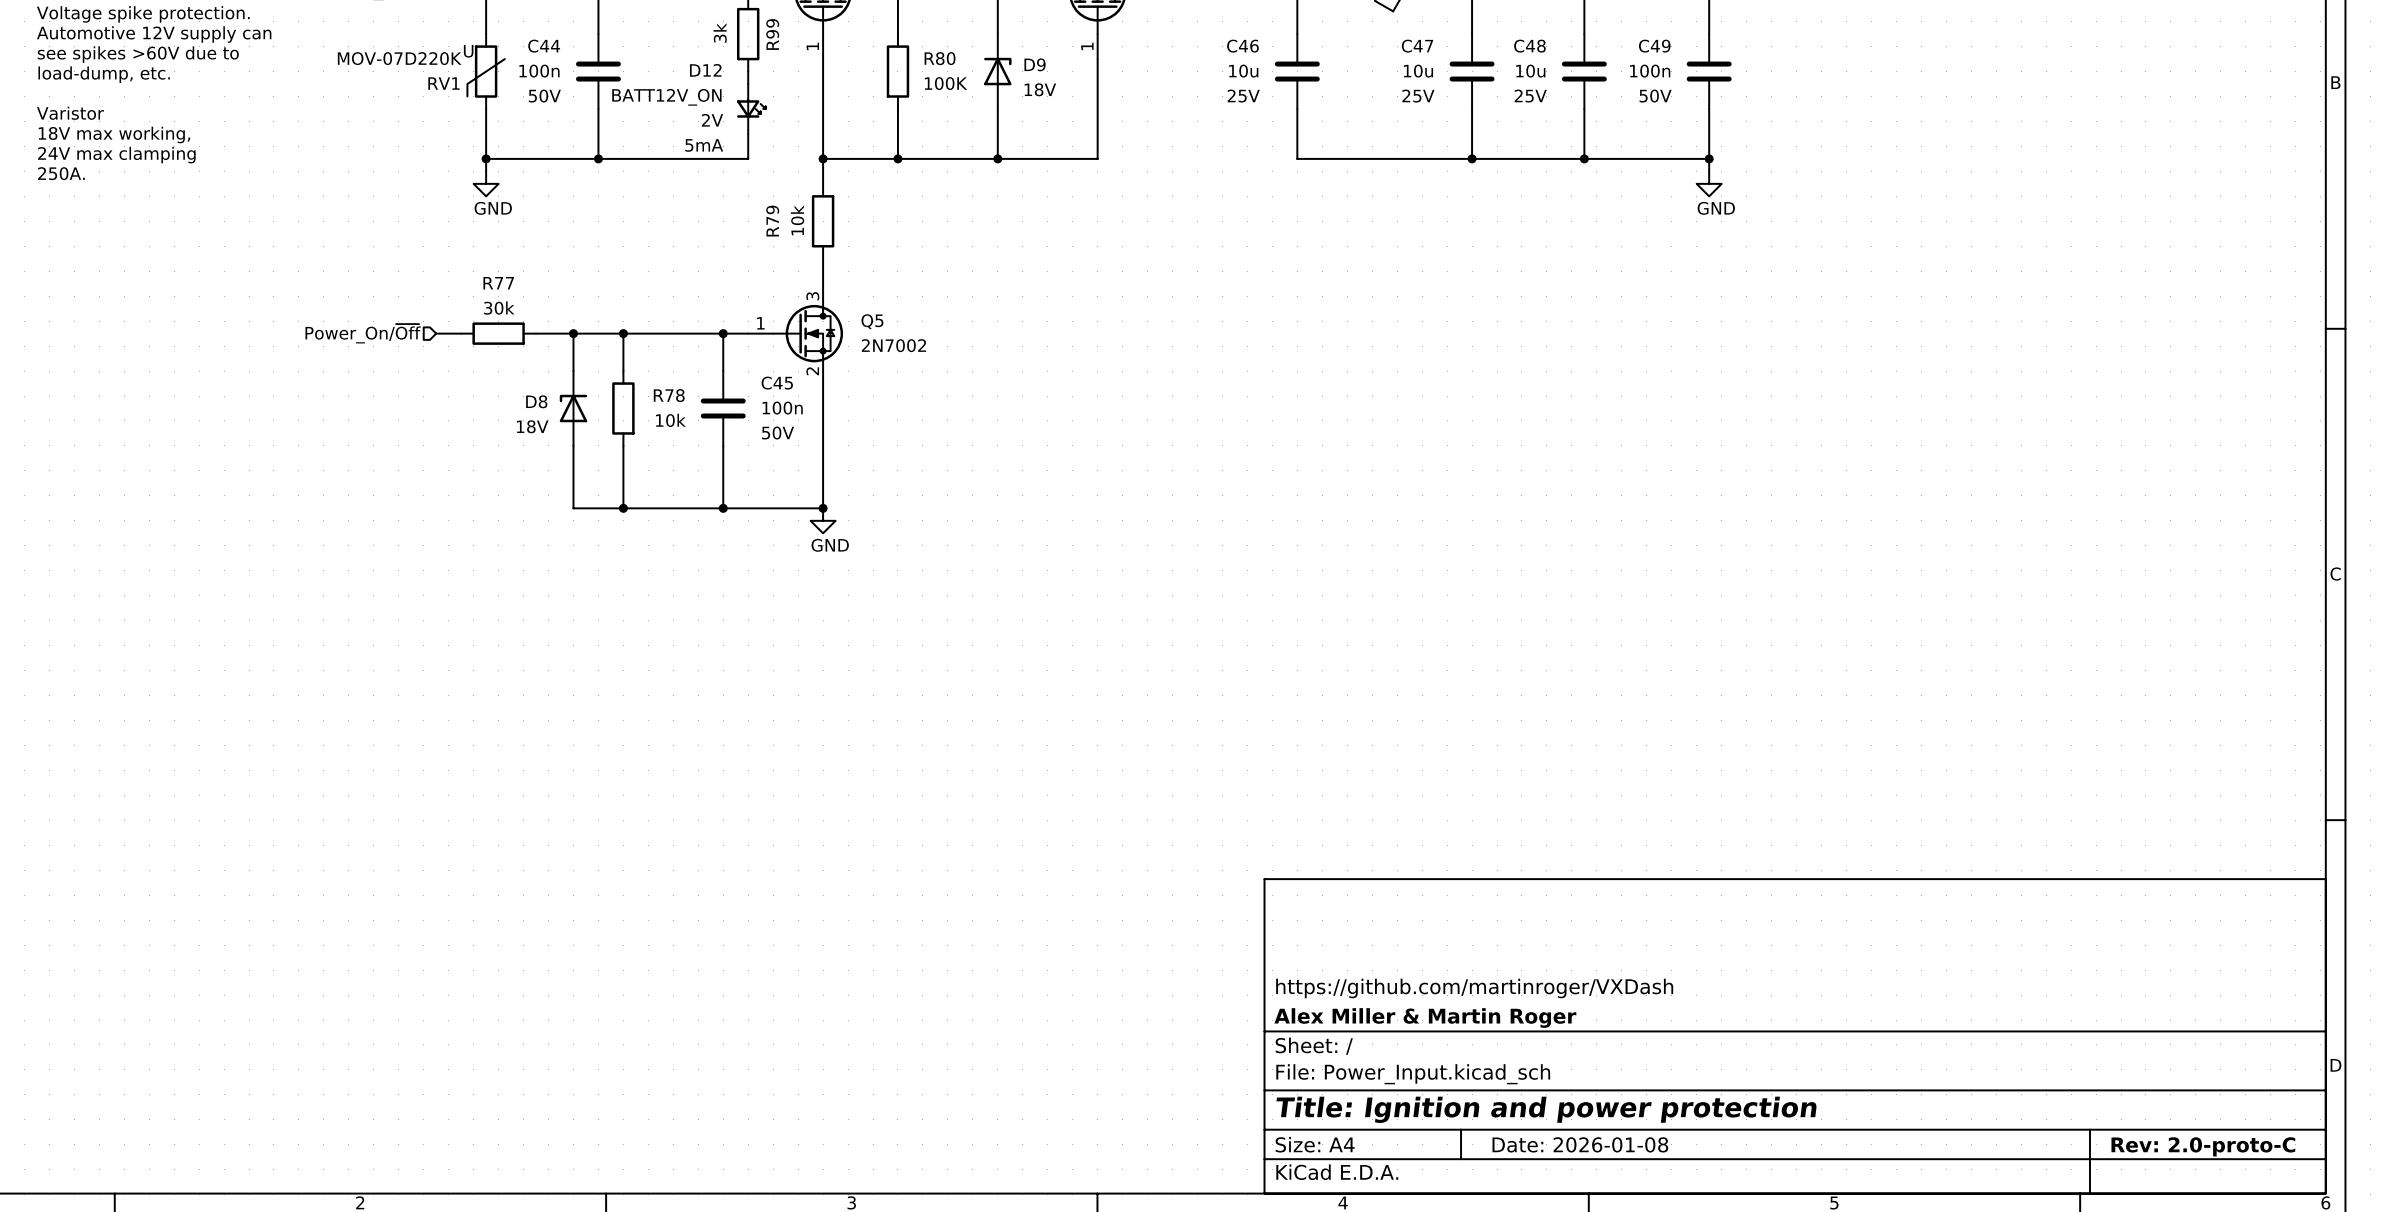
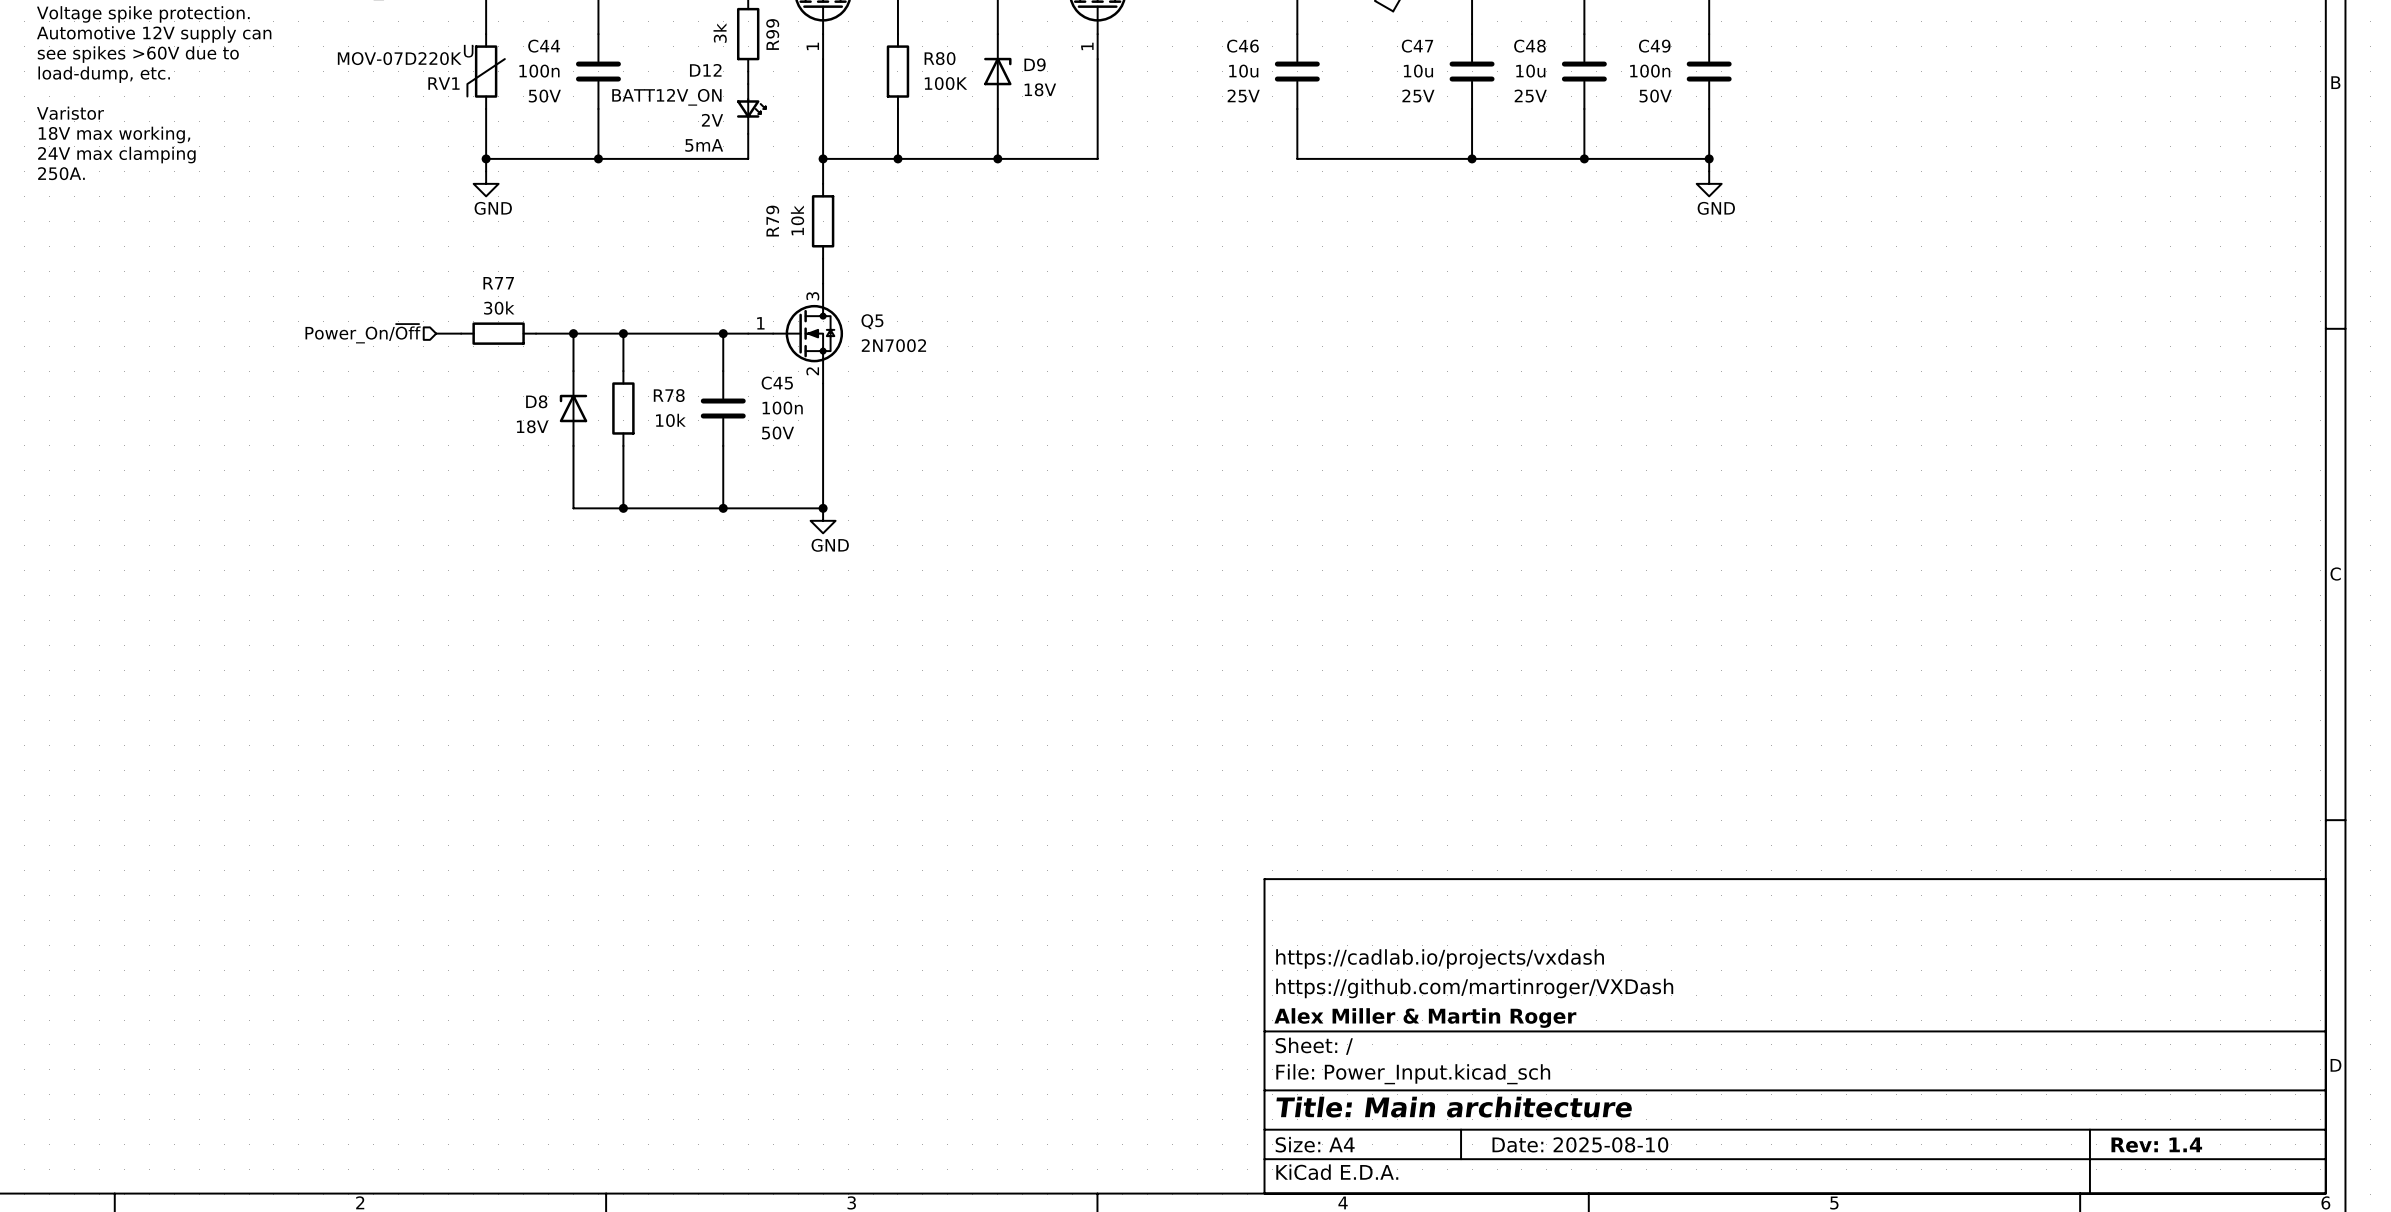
title block: none -> https://cadlab.io/projects/vxdash (1440, 958)
title block: Title: Ignition and power protection (1546, 1109) -> Title: Main architecture (1454, 1107)
title block: Date: 2026-01-08 (1580, 1144) -> Date: 2025-08-10 (1580, 1144)
title block: Rev: 2.0-proto-C (2203, 1146) -> Rev: 1.4 (2156, 1145)

